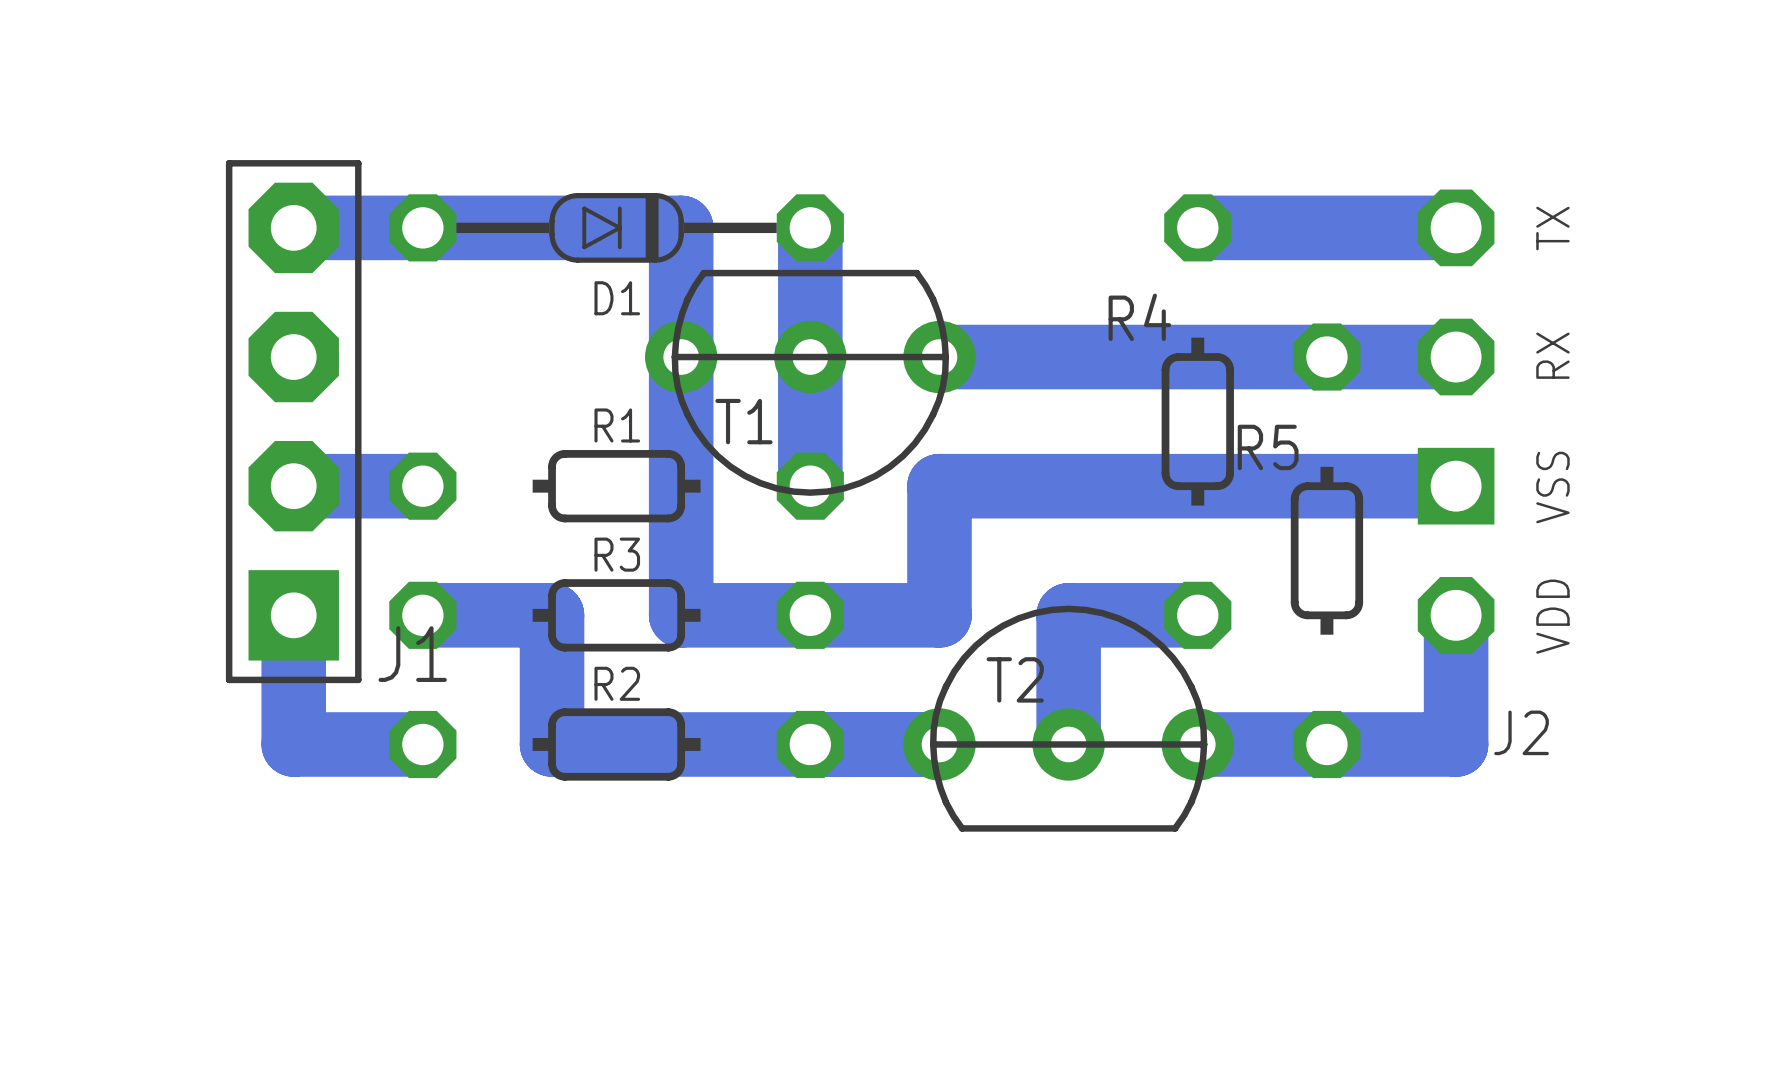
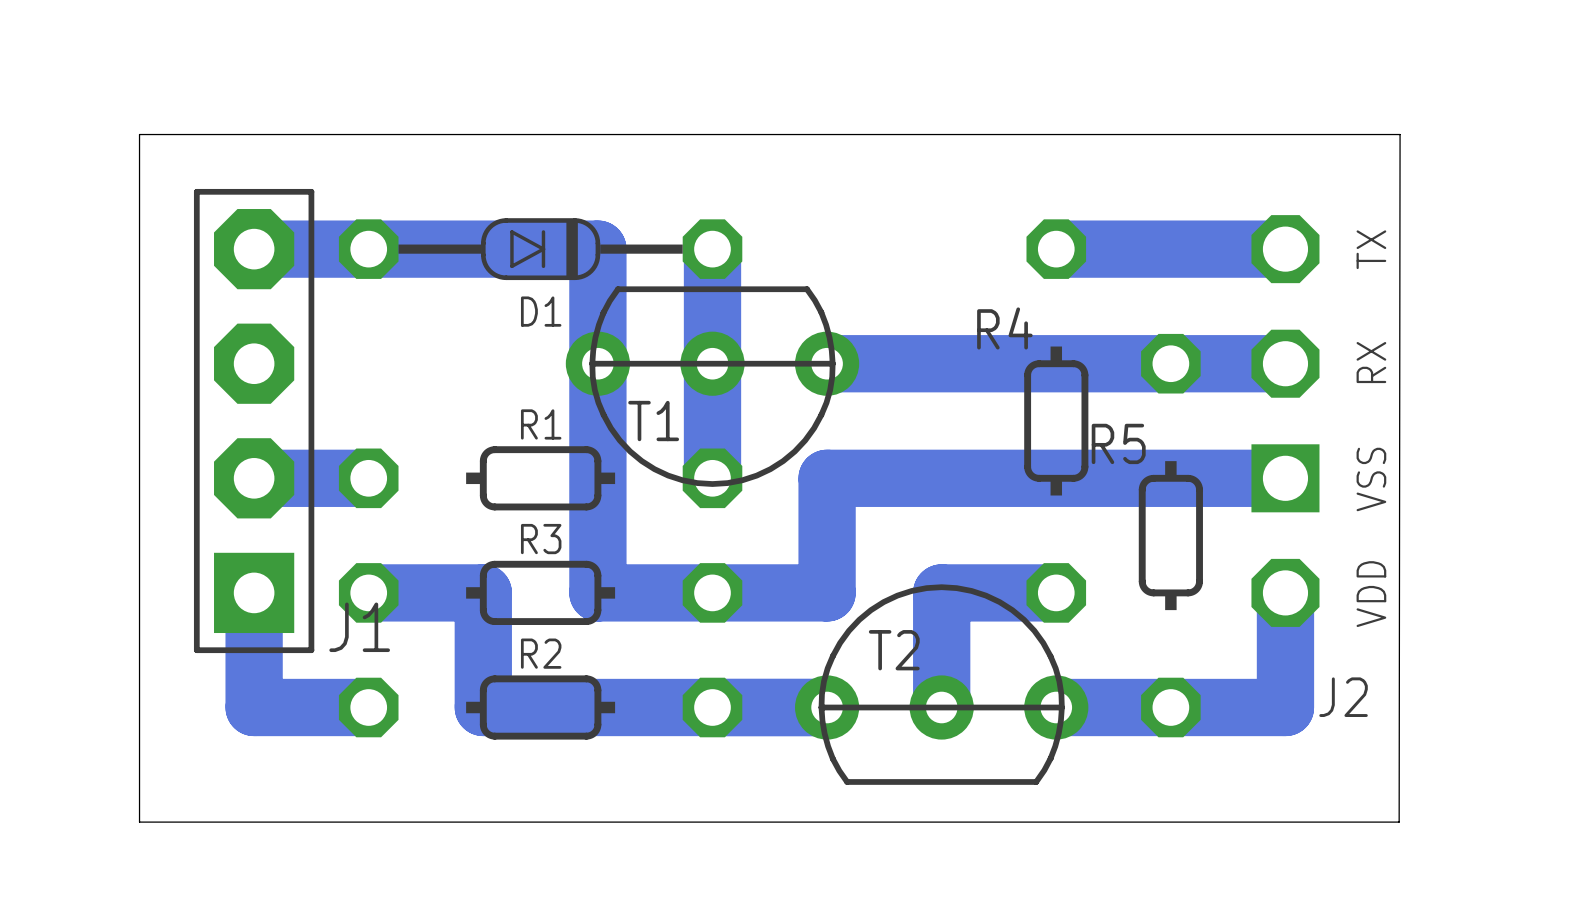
board edge: none -> (139, 134) (1400, 134) (1399, 822) (139, 822) (139, 134)

